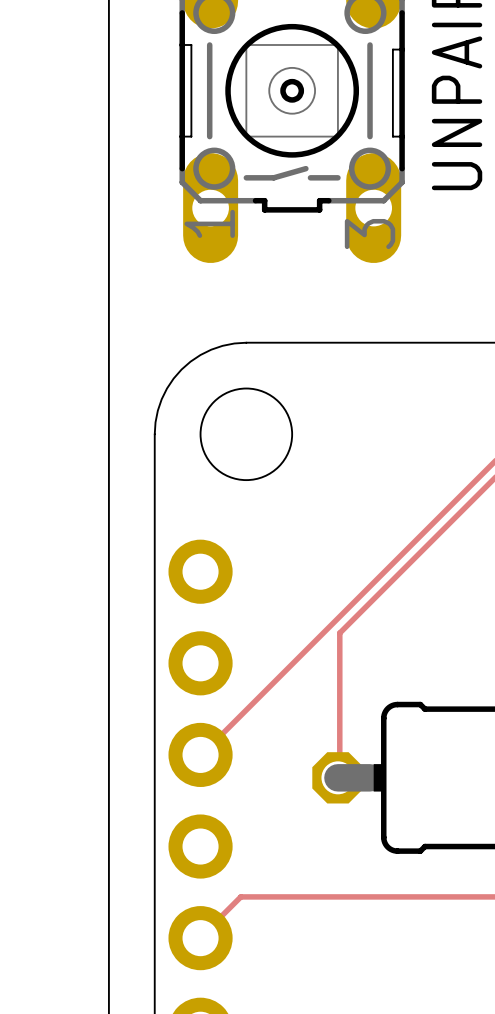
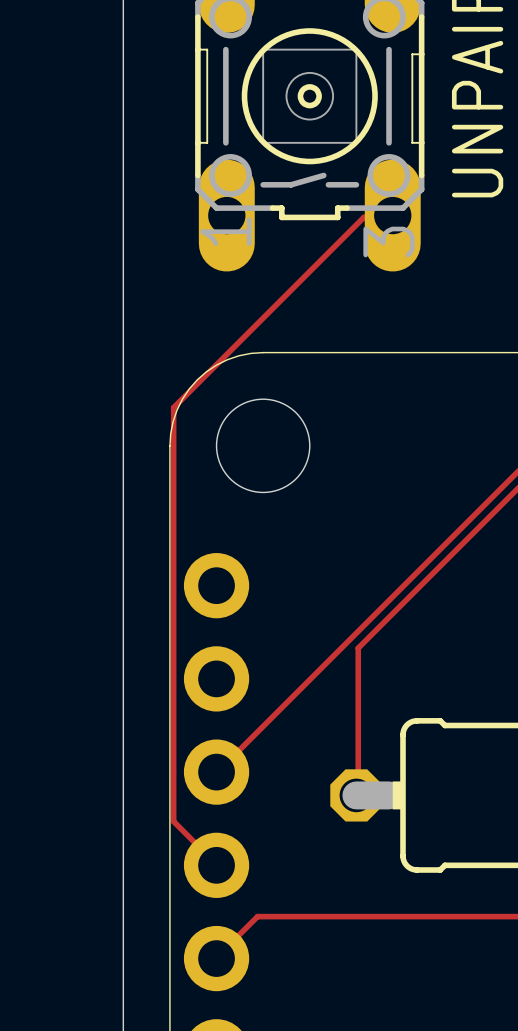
track: none -> (392, 215) (391, 217) (363, 217) (173, 407) (173, 821) (216, 865)

